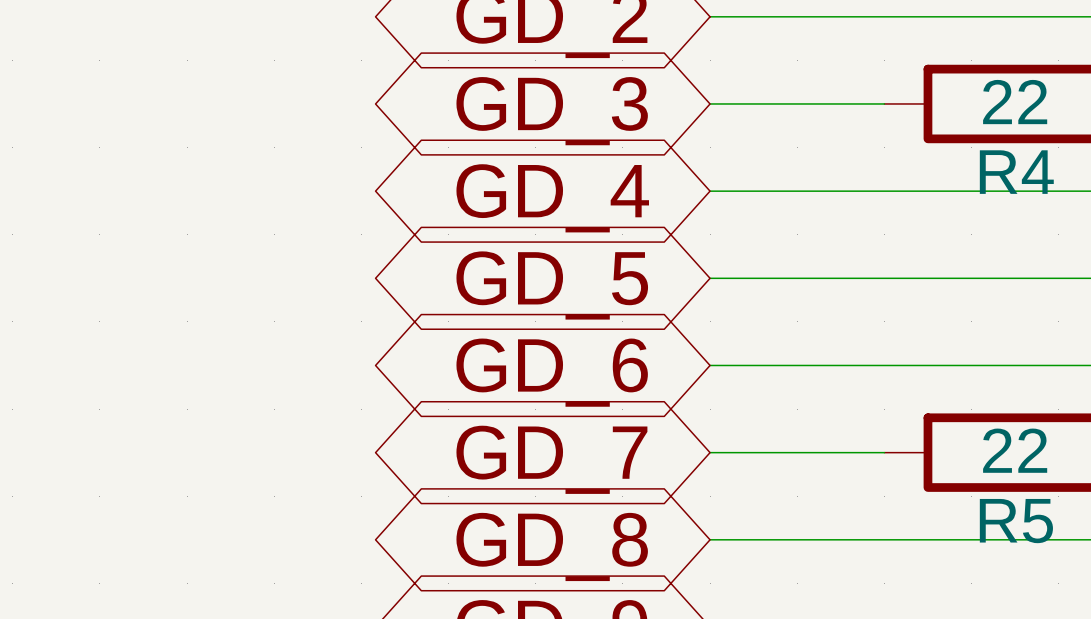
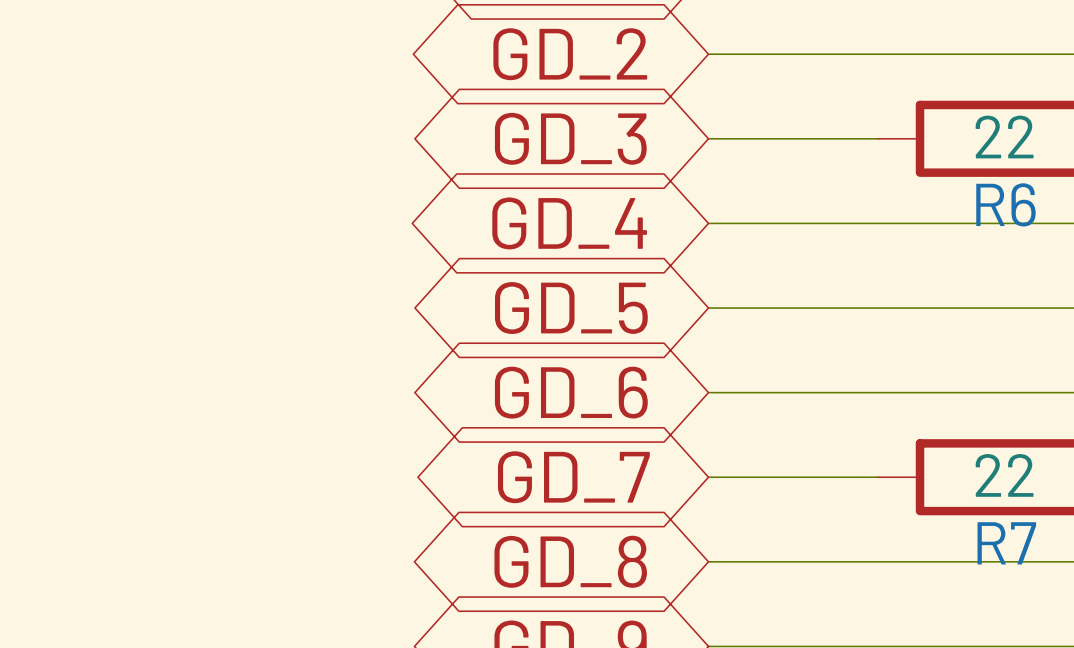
R4 name: R4 (1016, 172) -> R6 (1005, 204)
R5 name: R5 (1016, 521) -> R7 (1006, 543)

